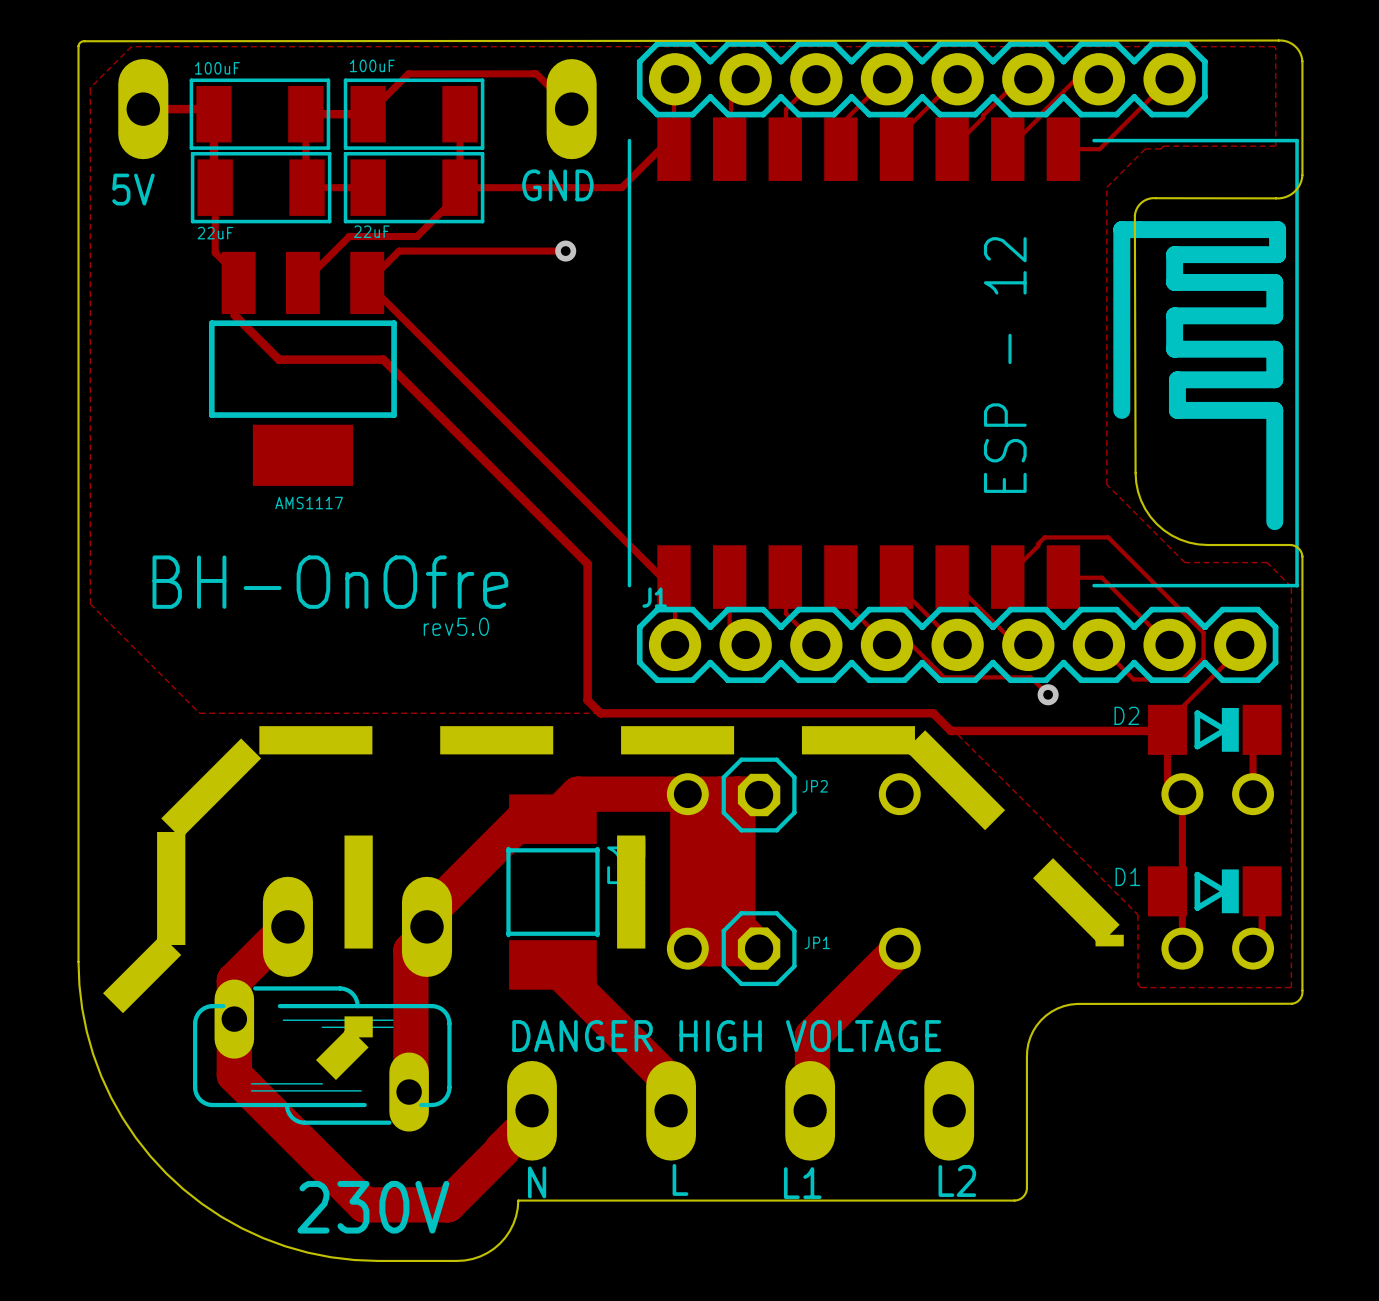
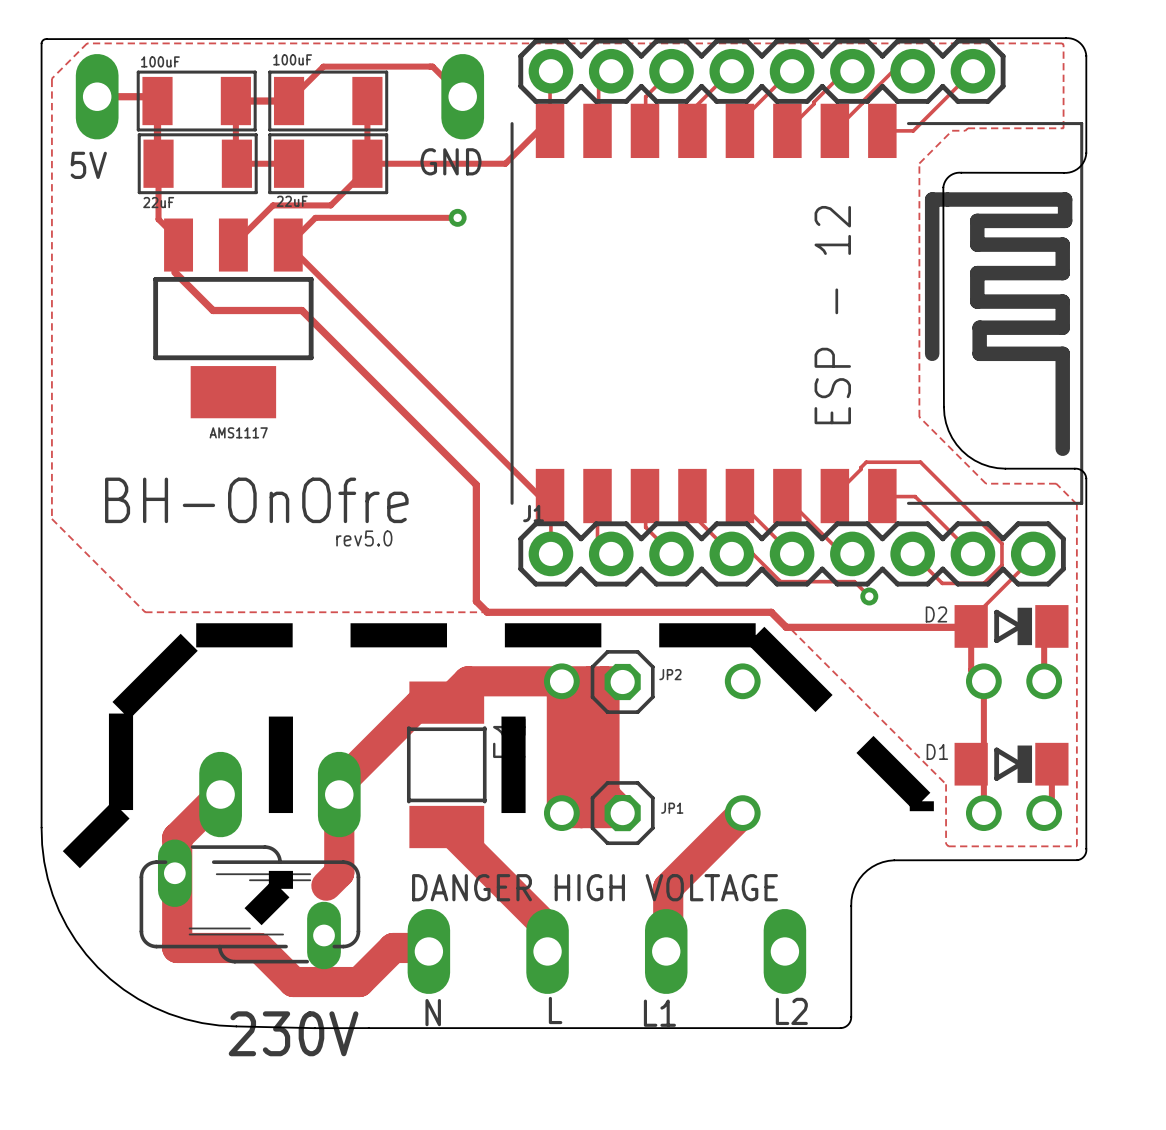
board edge: (1278, 40) (83, 41) (79, 43) (78, 961) (82, 1008) (86, 1031) (101, 1076) (111, 1097) (135, 1137) (166, 1173) (201, 1203) (221, 1216) (242, 1228) (285, 1246) (331, 1257) (354, 1260) (456, 1260) (472, 1259) (494, 1248) (505, 1237) (513, 1223) (518, 1200) -> (1066, 38) (46, 39) (42, 41) (41, 827) (44, 861) (52, 895) (76, 940) (97, 967) (123, 989) (169, 1013) (219, 1025) (417, 1028)
track: (432, 921) (427, 926) (419, 942) (410, 950) (410, 1090) (409, 1092) -> none
track: none -> (339, 794) (339, 872) (326, 885)
track: (237, 977) (234, 980) (234, 1074) (364, 1204) (447, 1204) (532, 1119) -> (177, 837) (177, 947) (259, 947) (293, 982) (359, 982) (393, 947) (425, 947) (428, 951)

